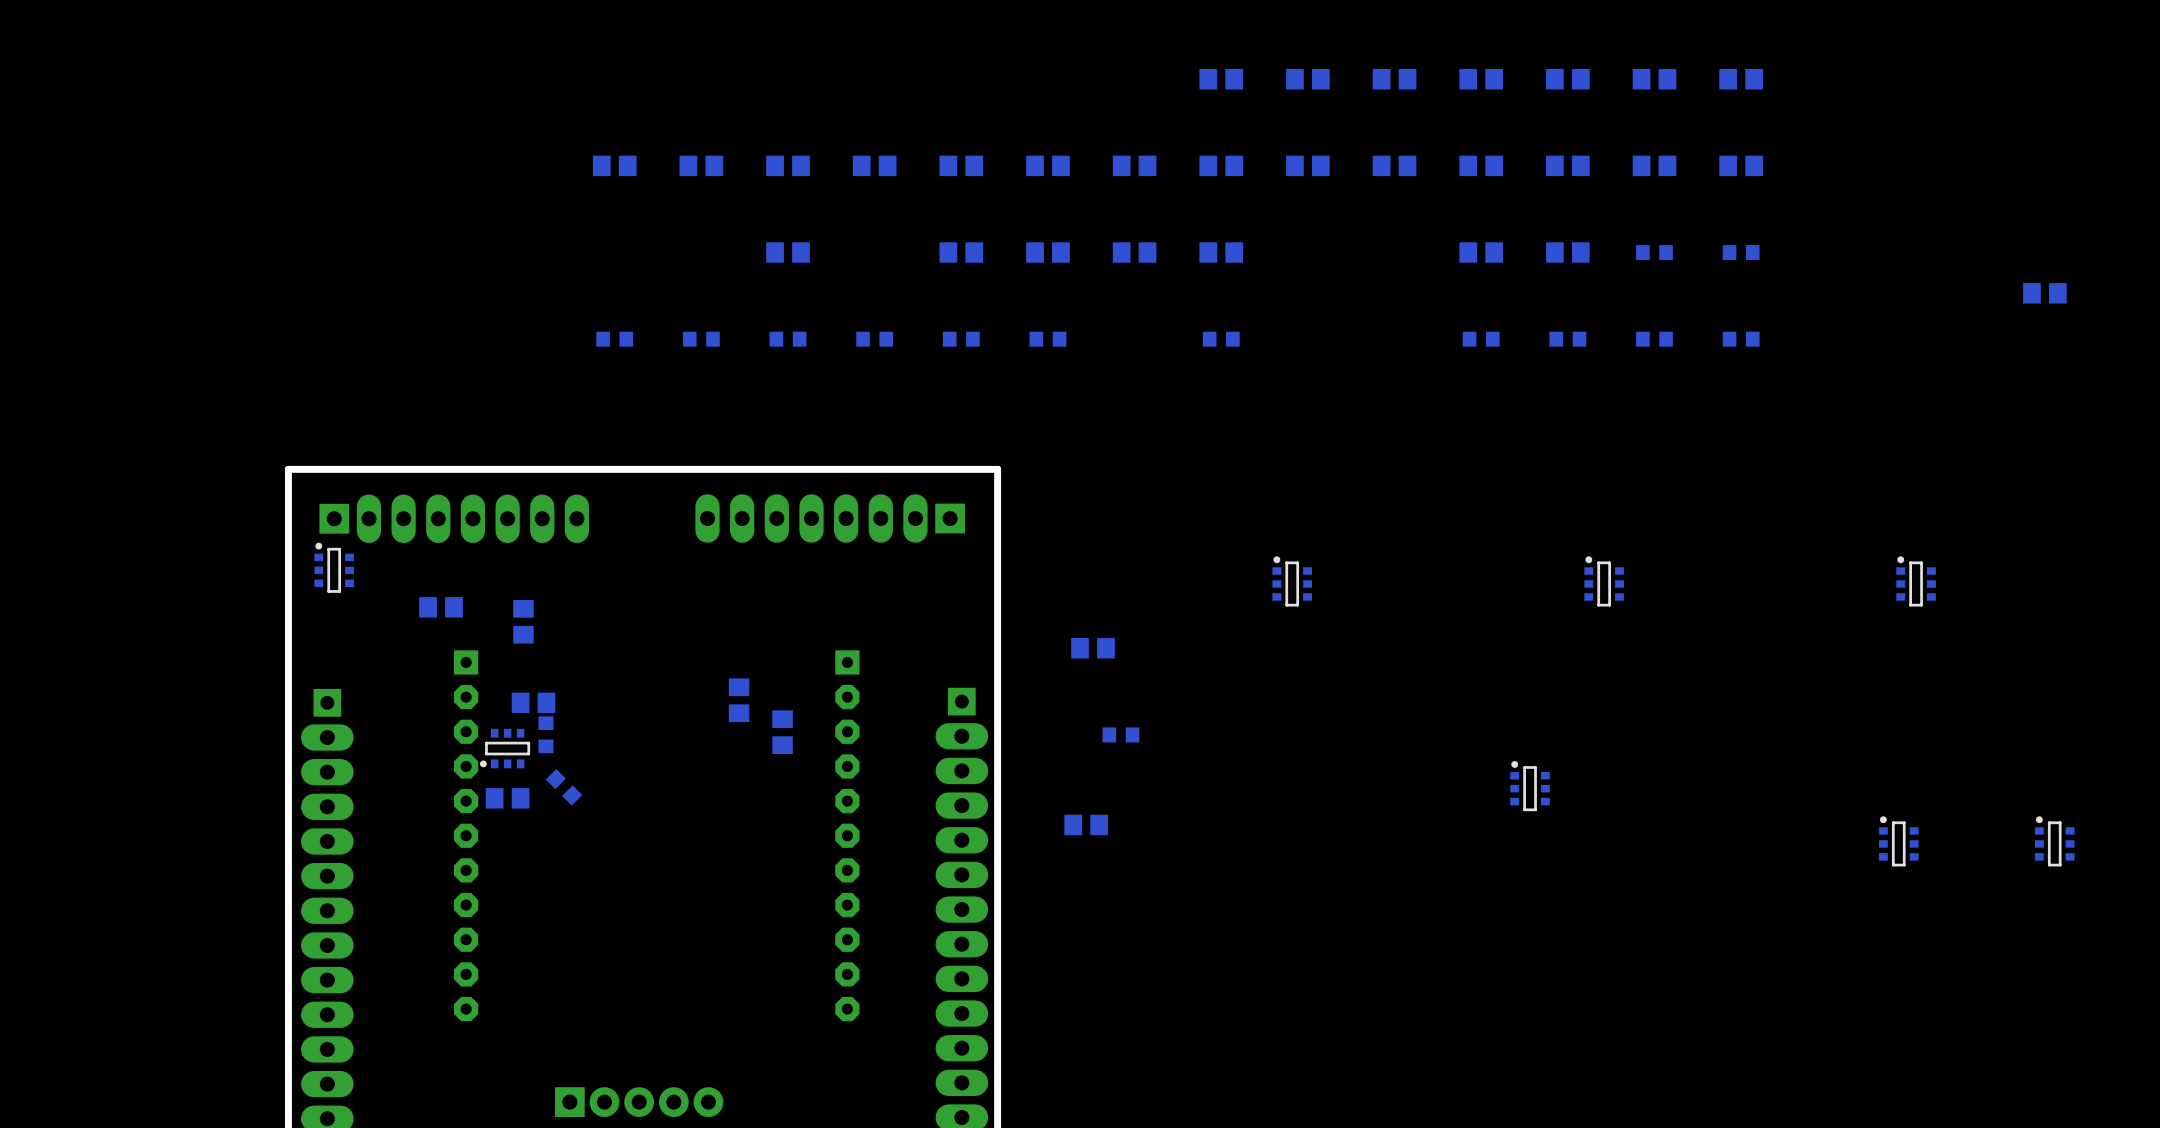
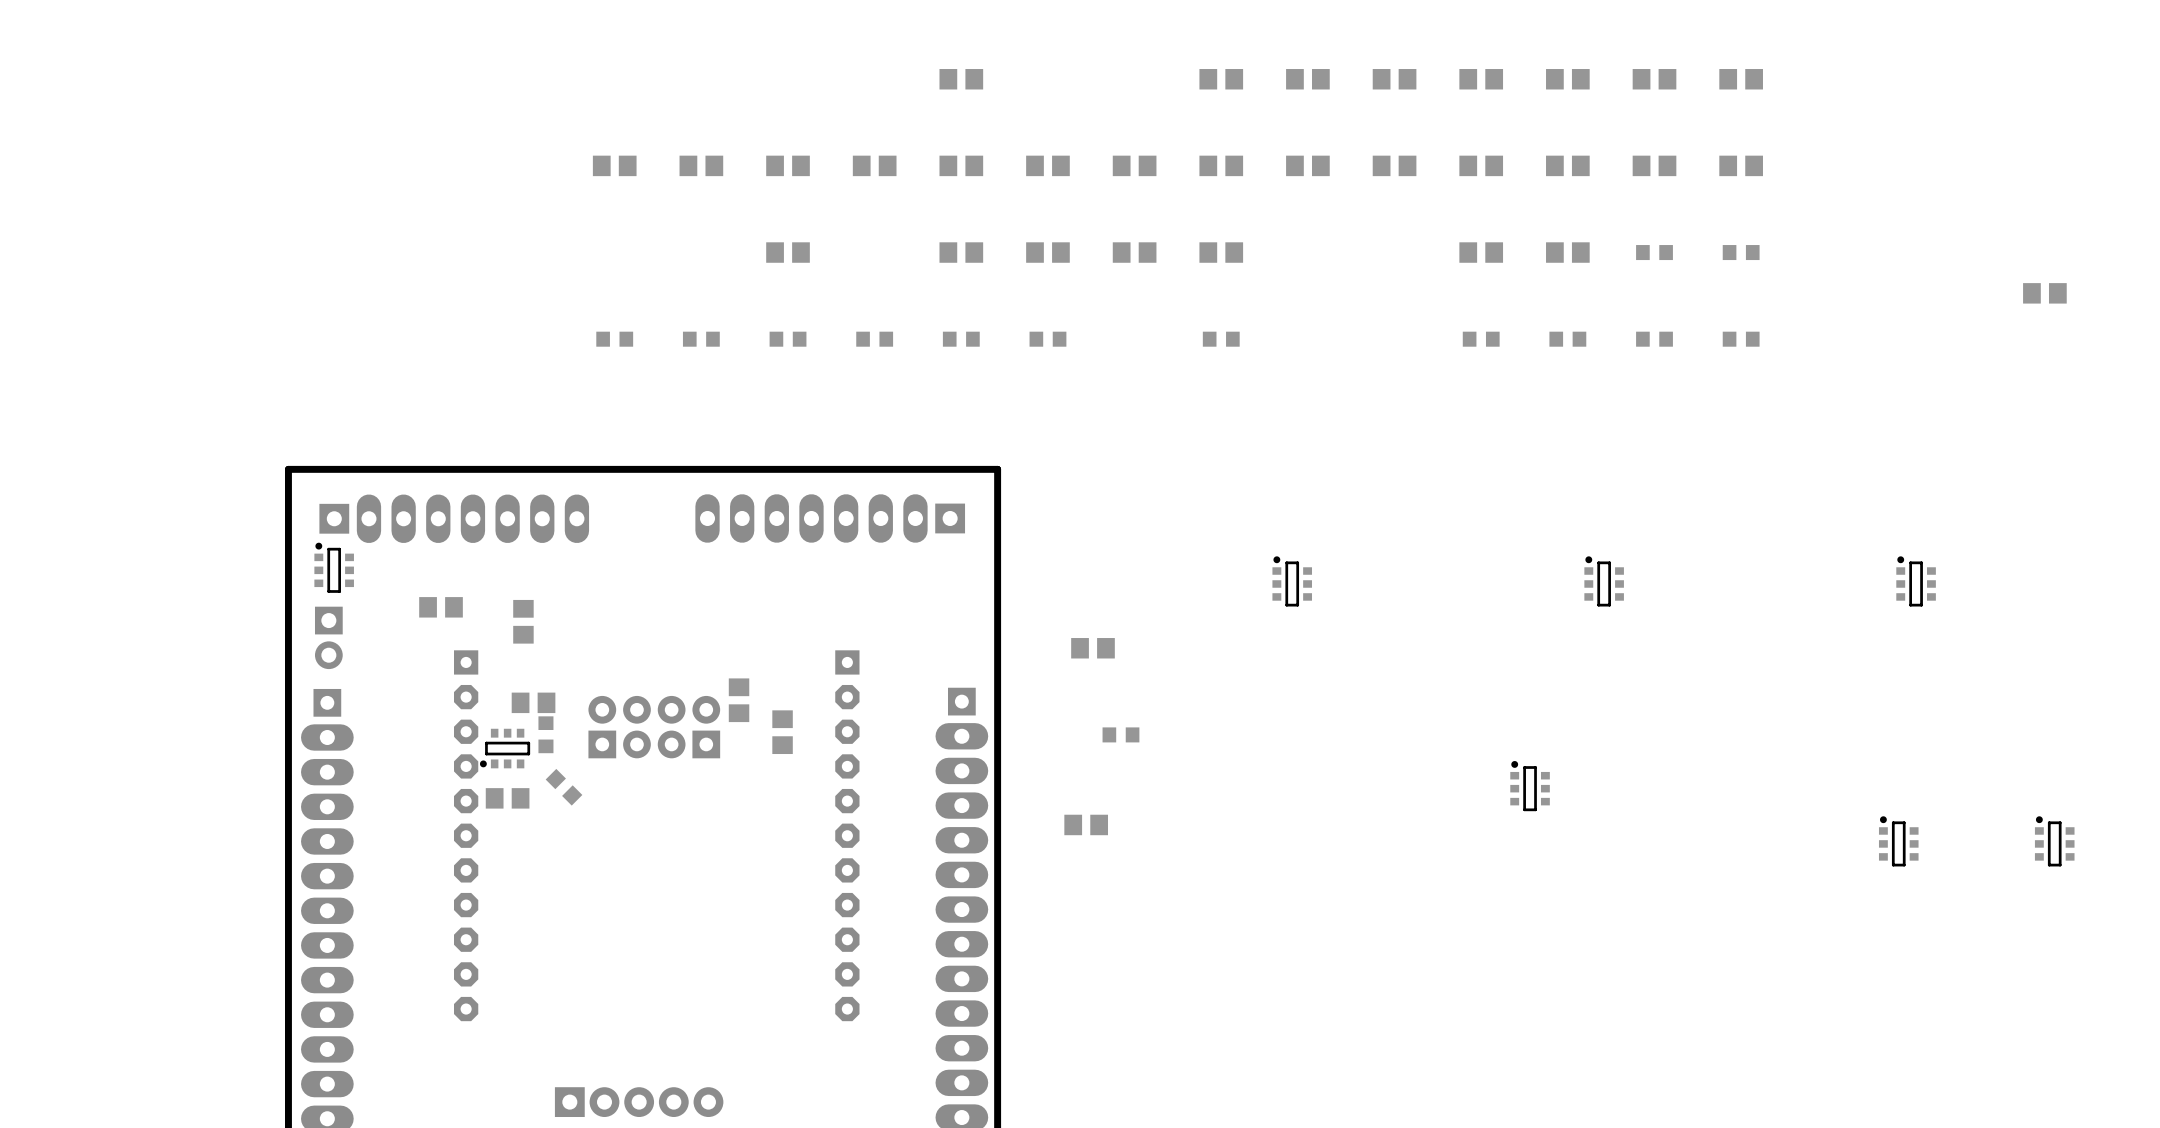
part: none -> (961, 79)
part: none -> (328, 637)
part: none -> (654, 727)

